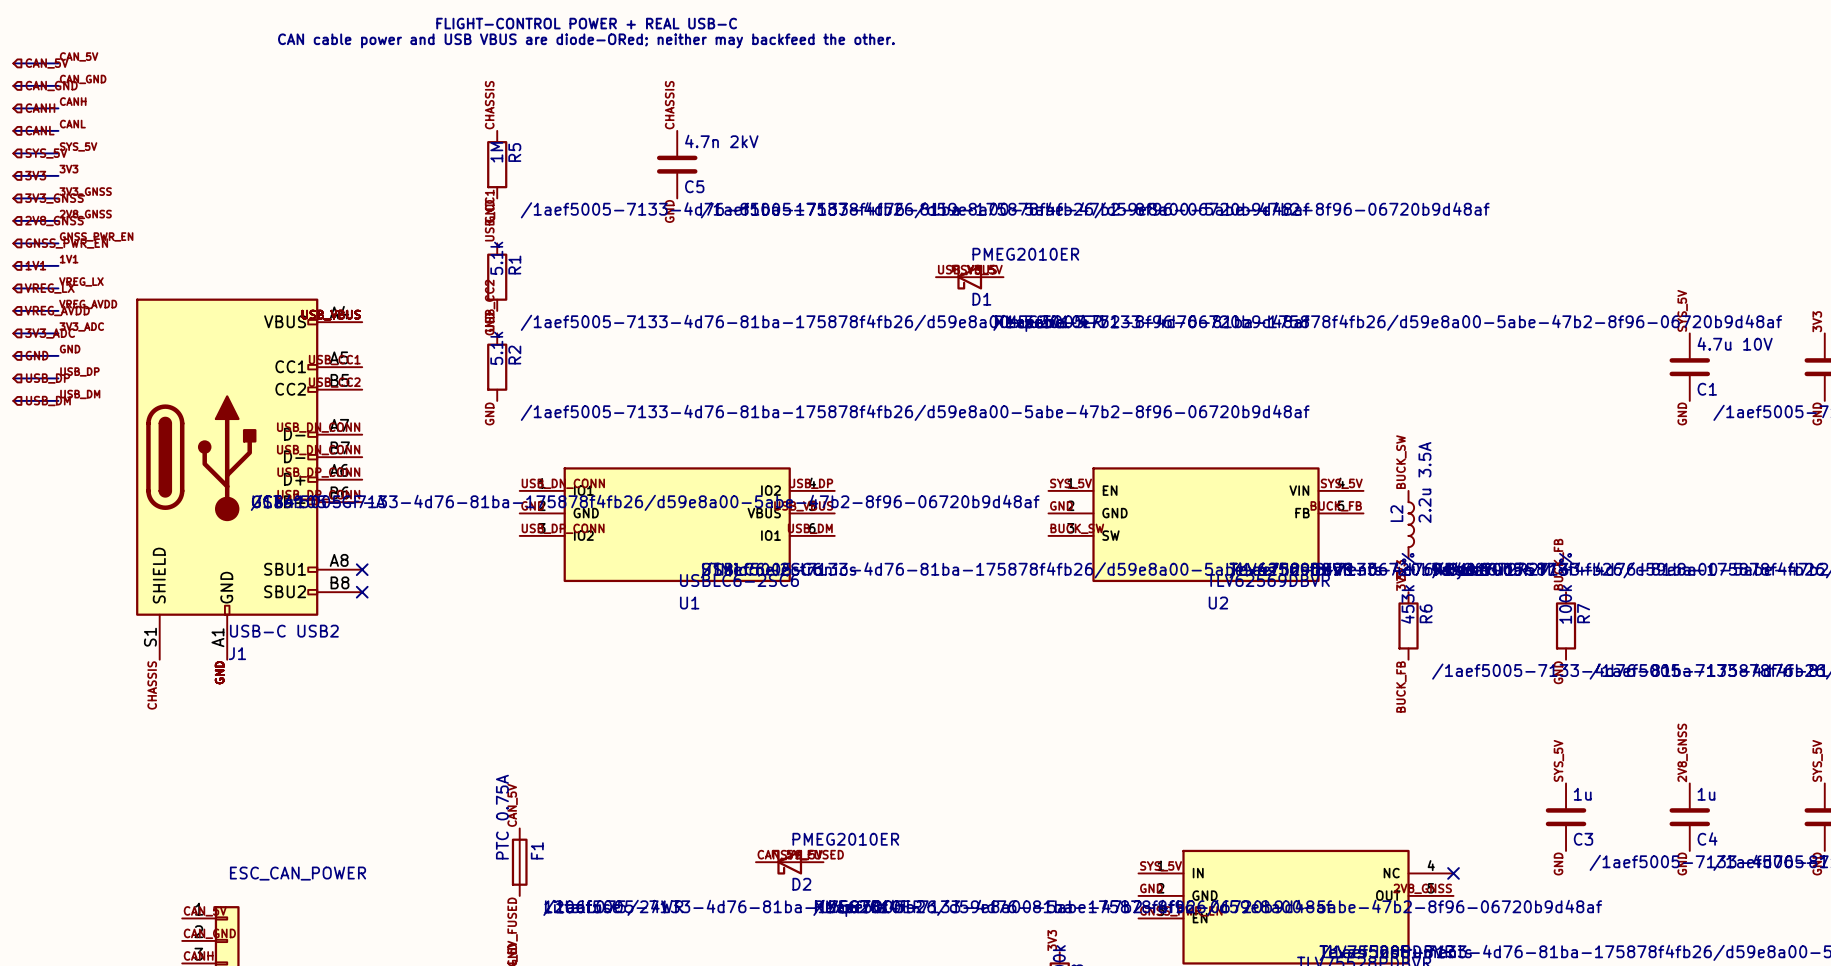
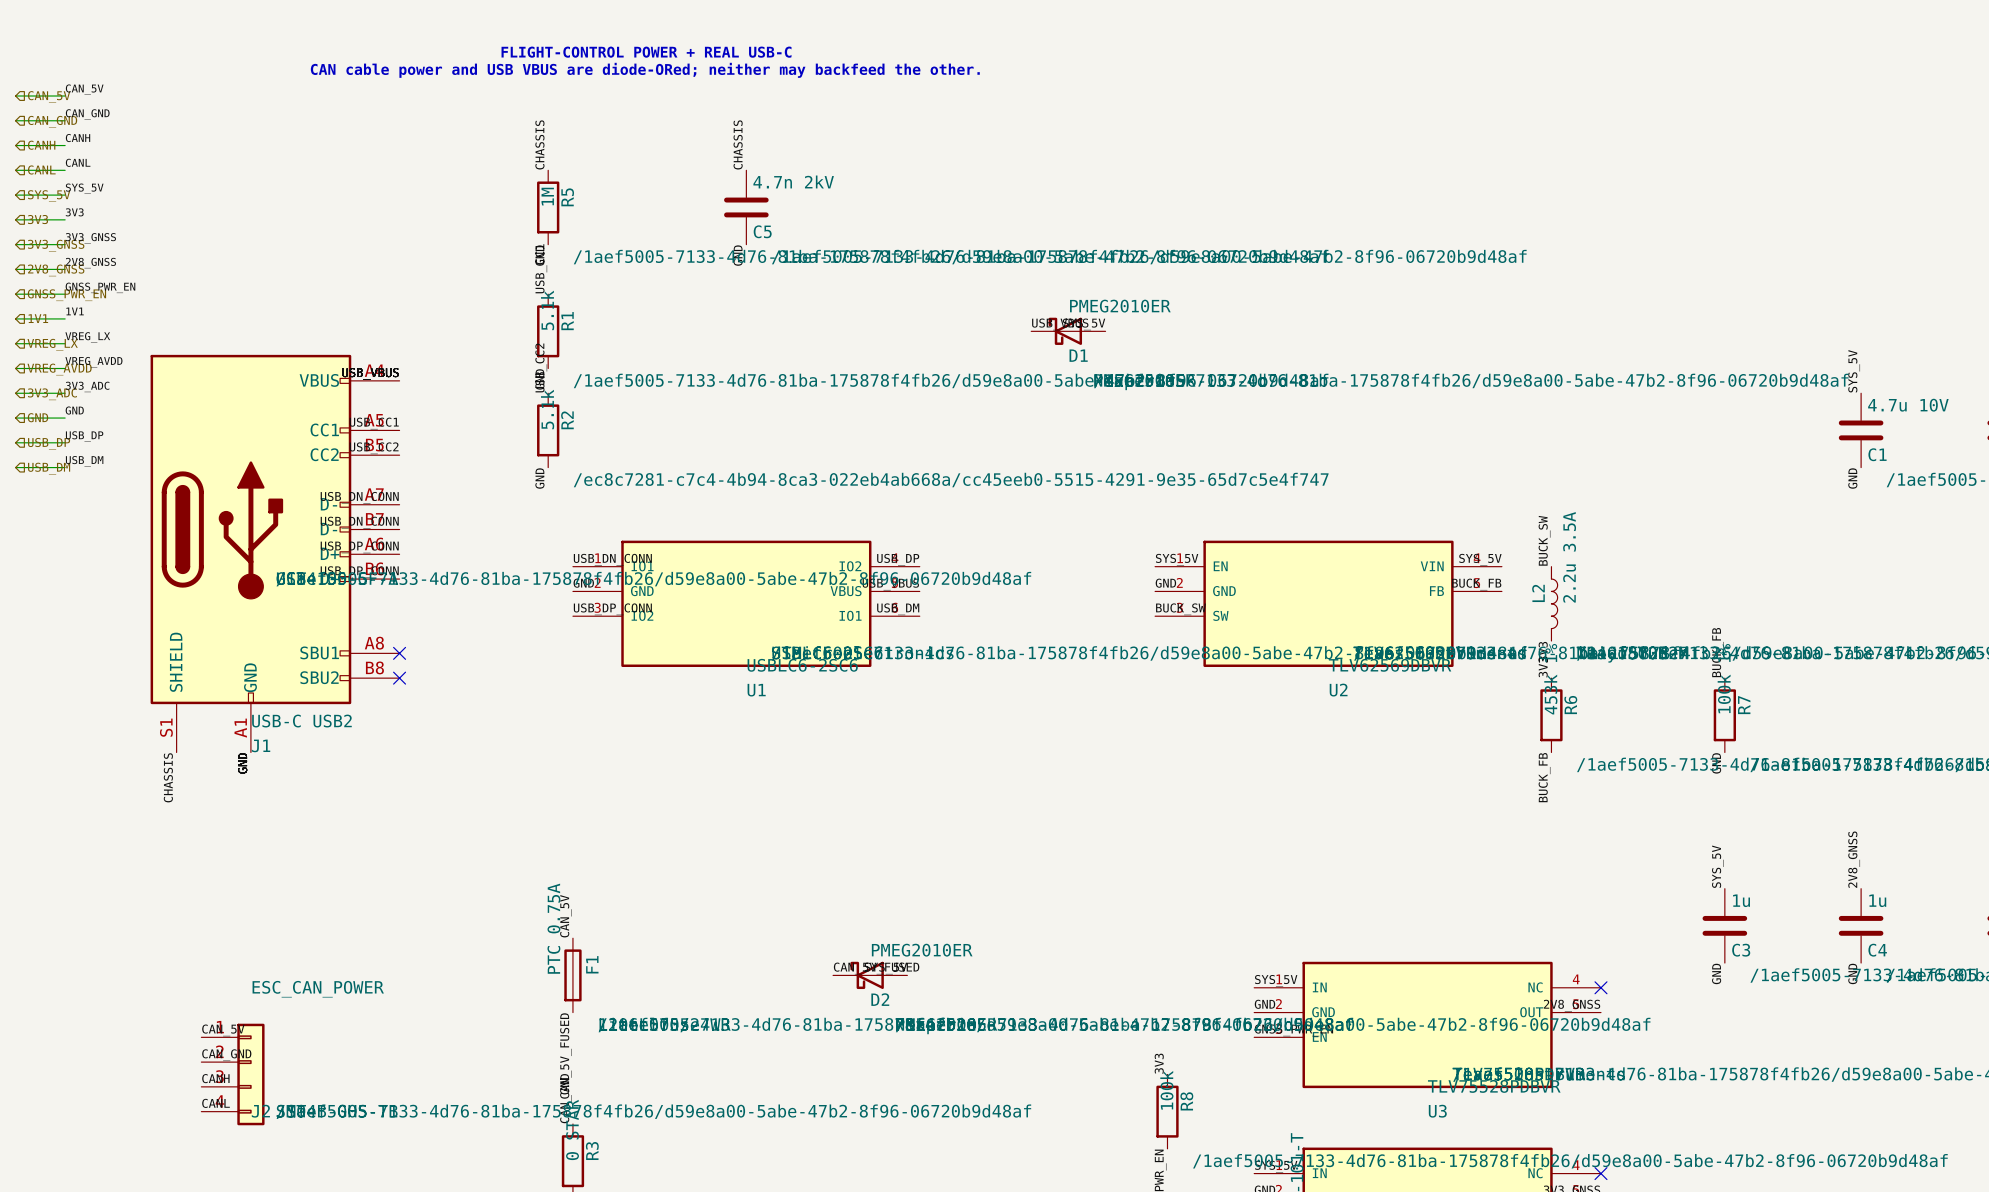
R2 text: /1aef5005-7133-4d76-81ba-175878f4fb26/d59e8a00-5abe-47b2-8f96-06720b9d48af (915, 412) -> /ec8c7281-c7c4-4b94-8ca3-022eb4ab668a/cc45eeb0-5515-4291-9e35-65d7c5e4f747 (951, 480)

